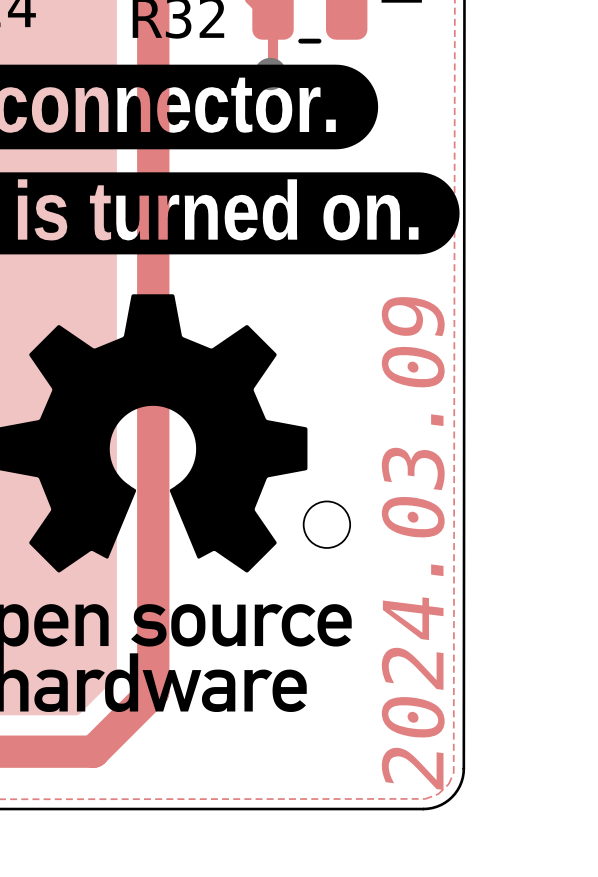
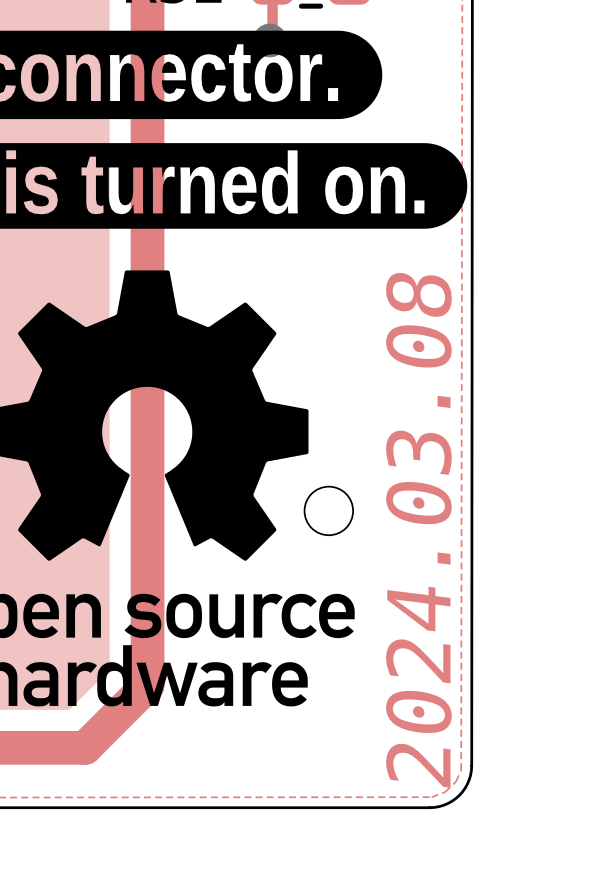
text: 2024.03.09 (413, 542) -> 2024.03.08 (418, 529)

